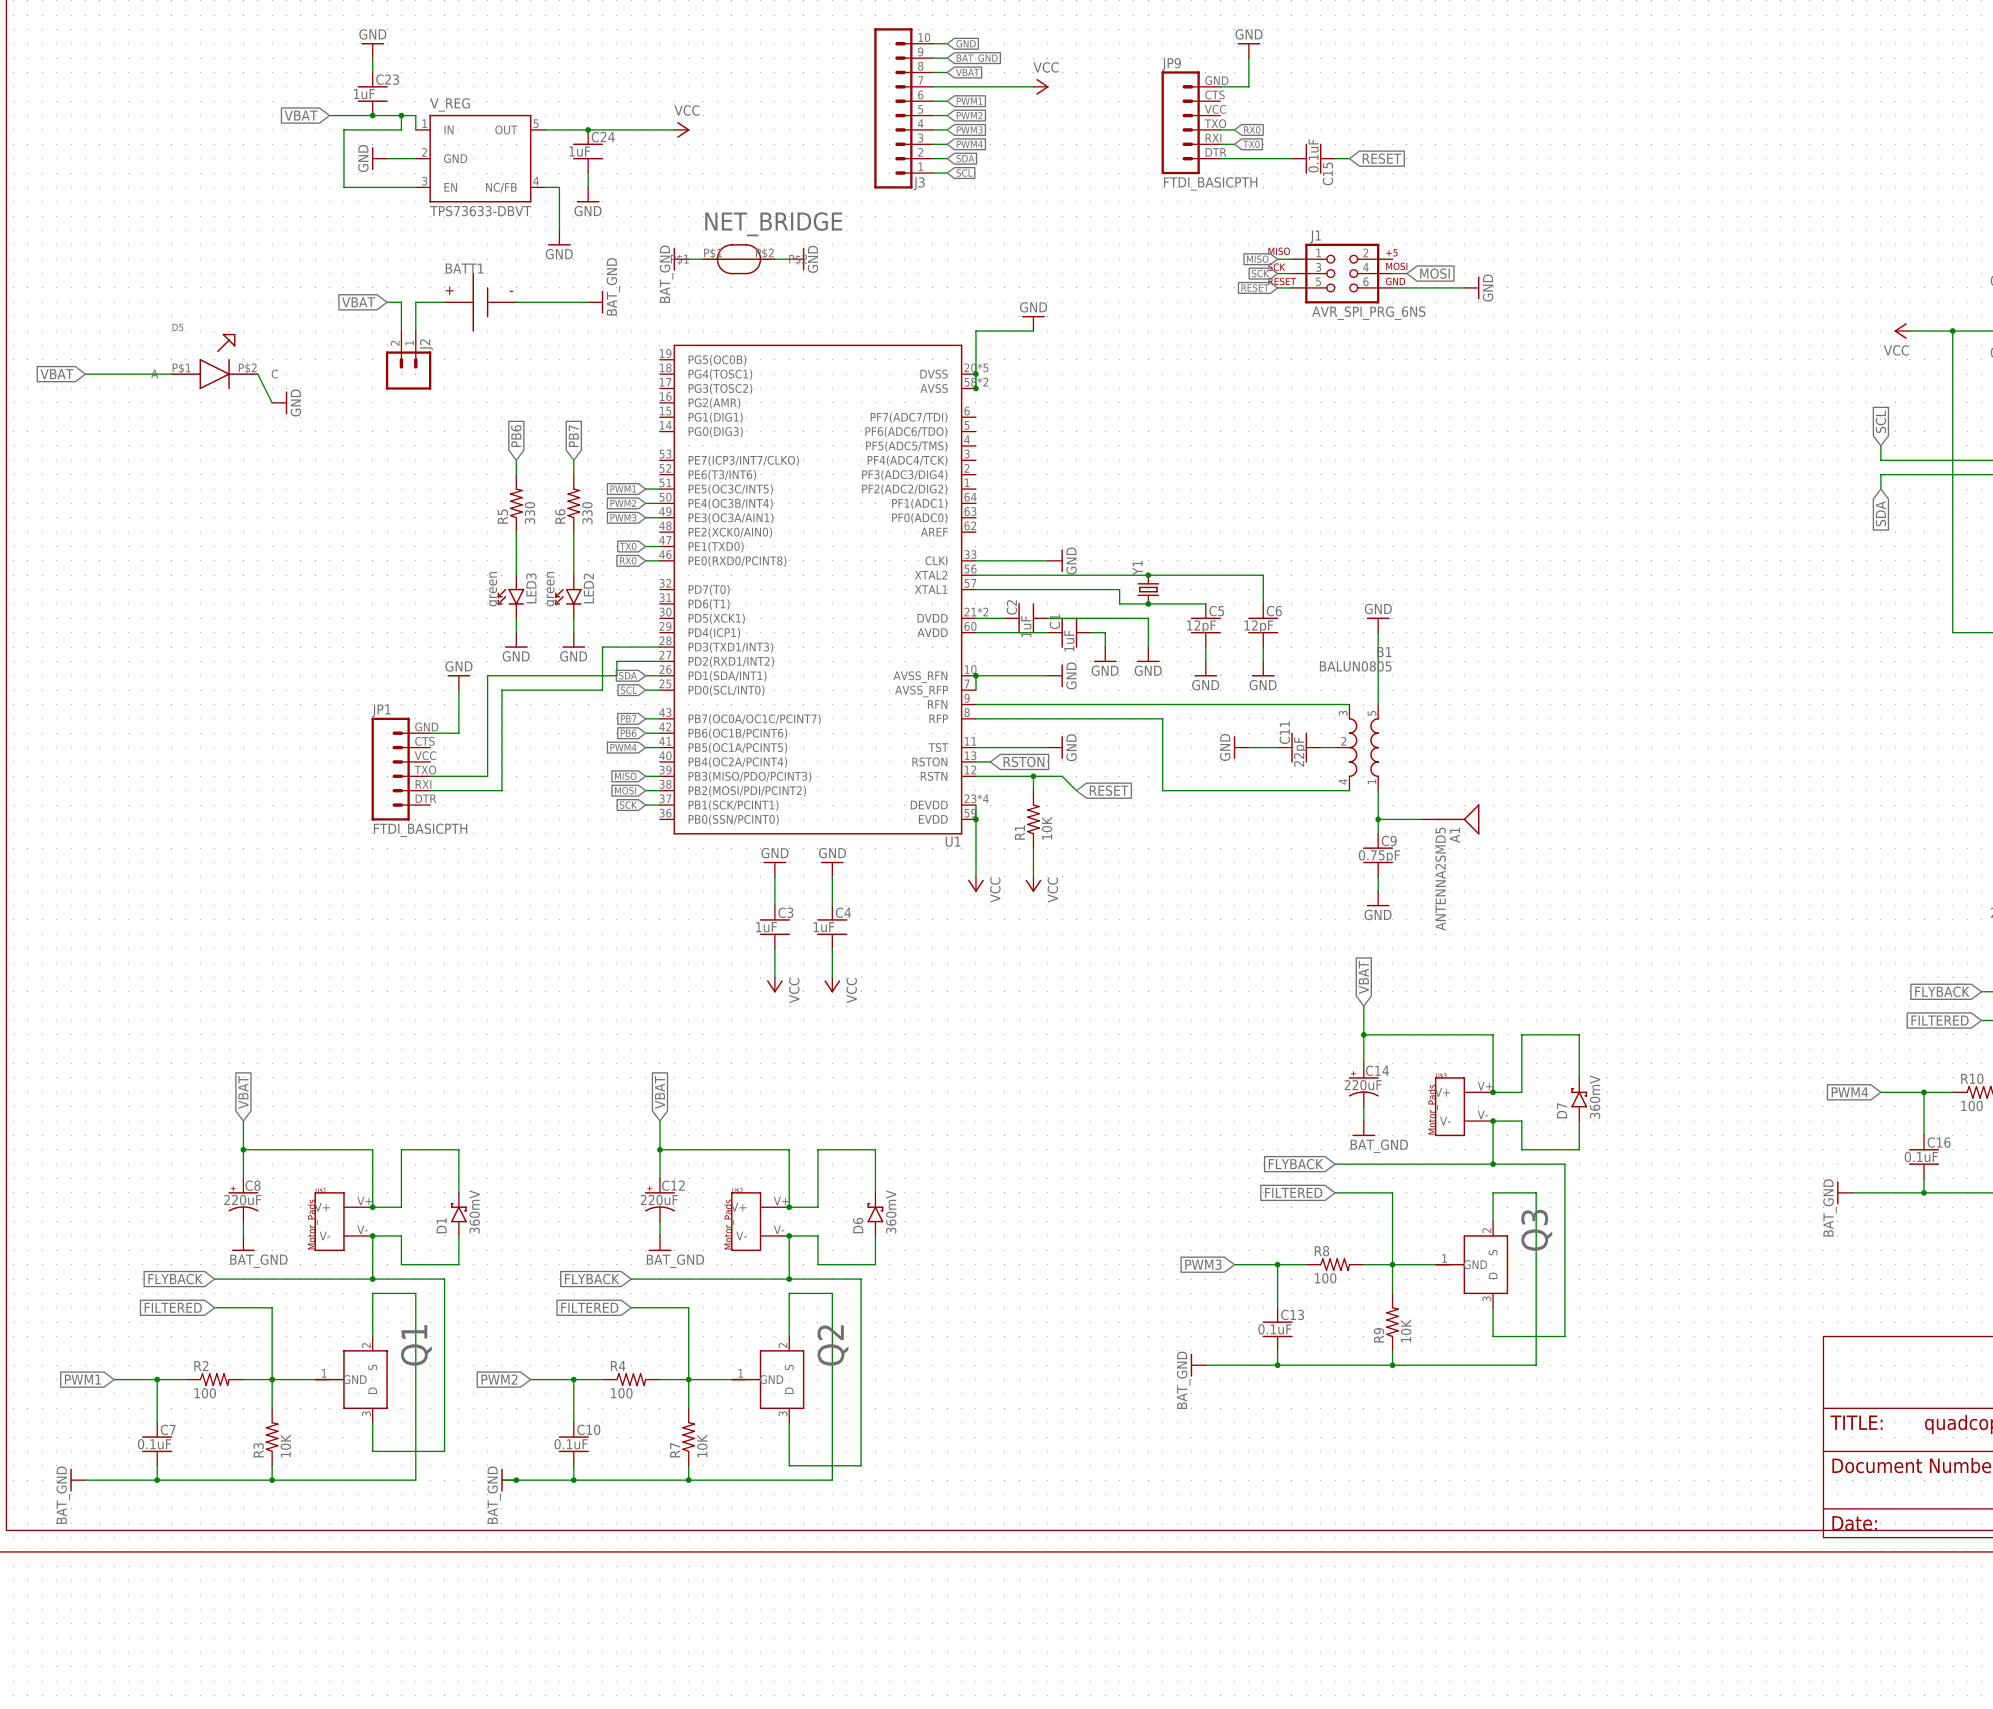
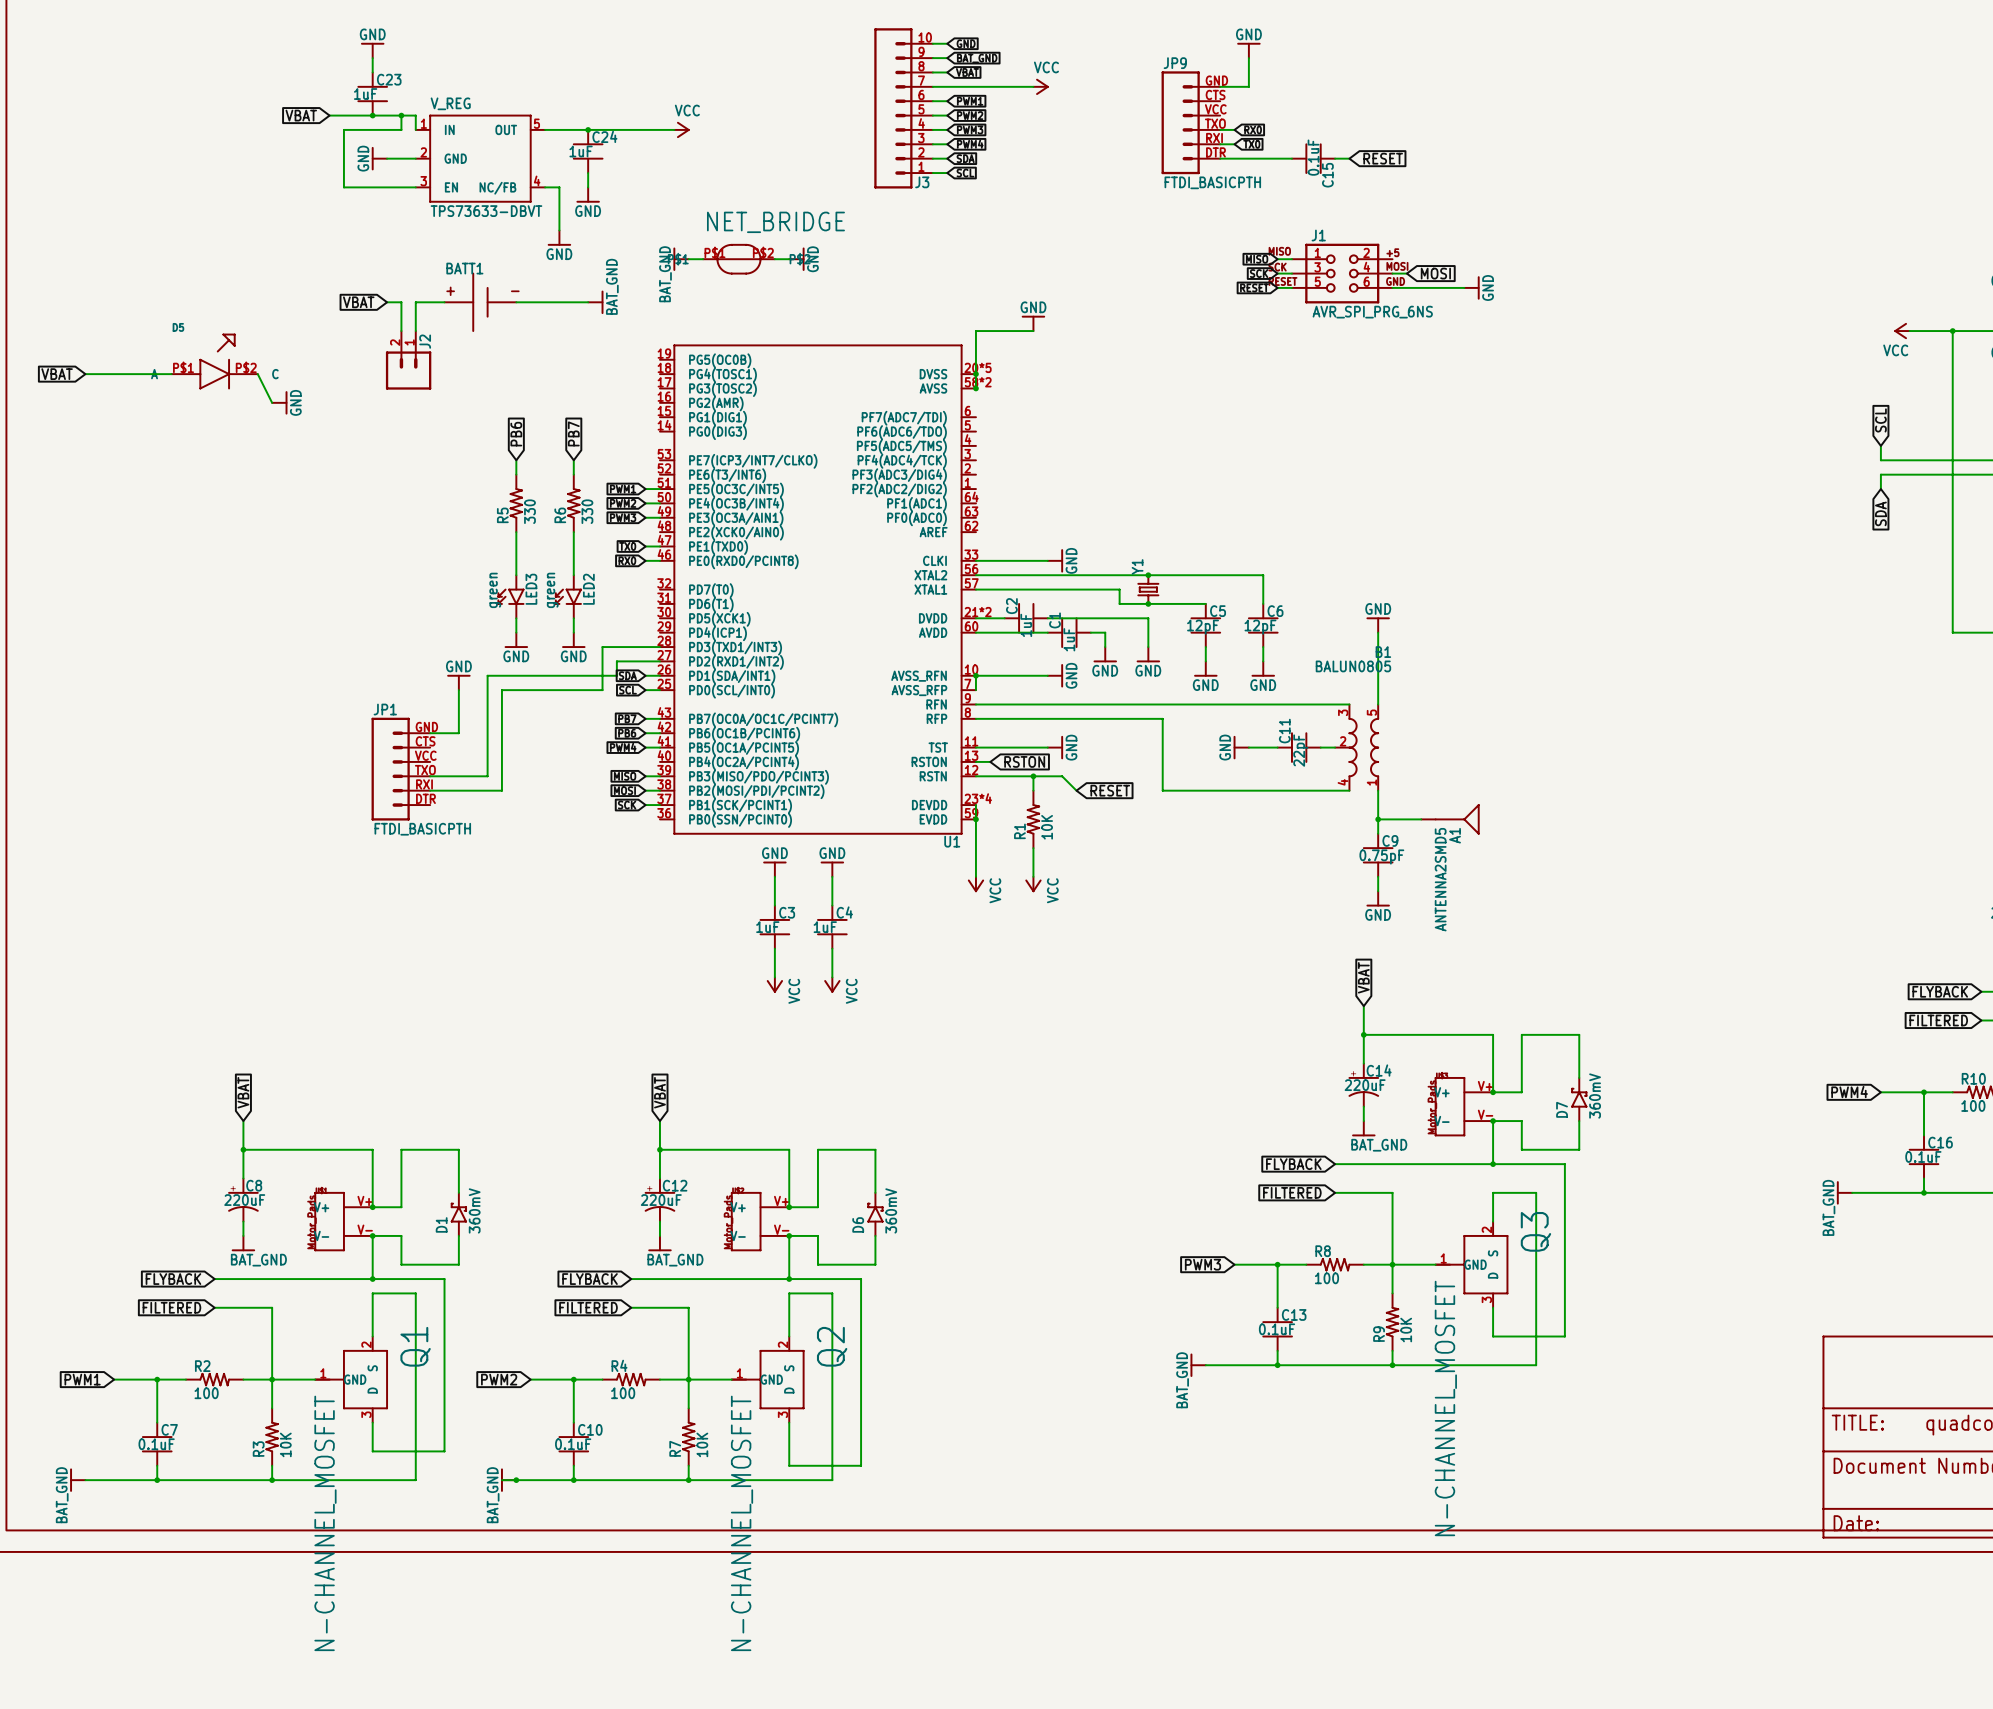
Q3 value: none -> N-CHANNEL_MOSFET (1445, 1408)
Q1 value: none -> N-CHANNEL_MOSFET (325, 1523)
Q2 value: none -> N-CHANNEL_MOSFET (742, 1523)

